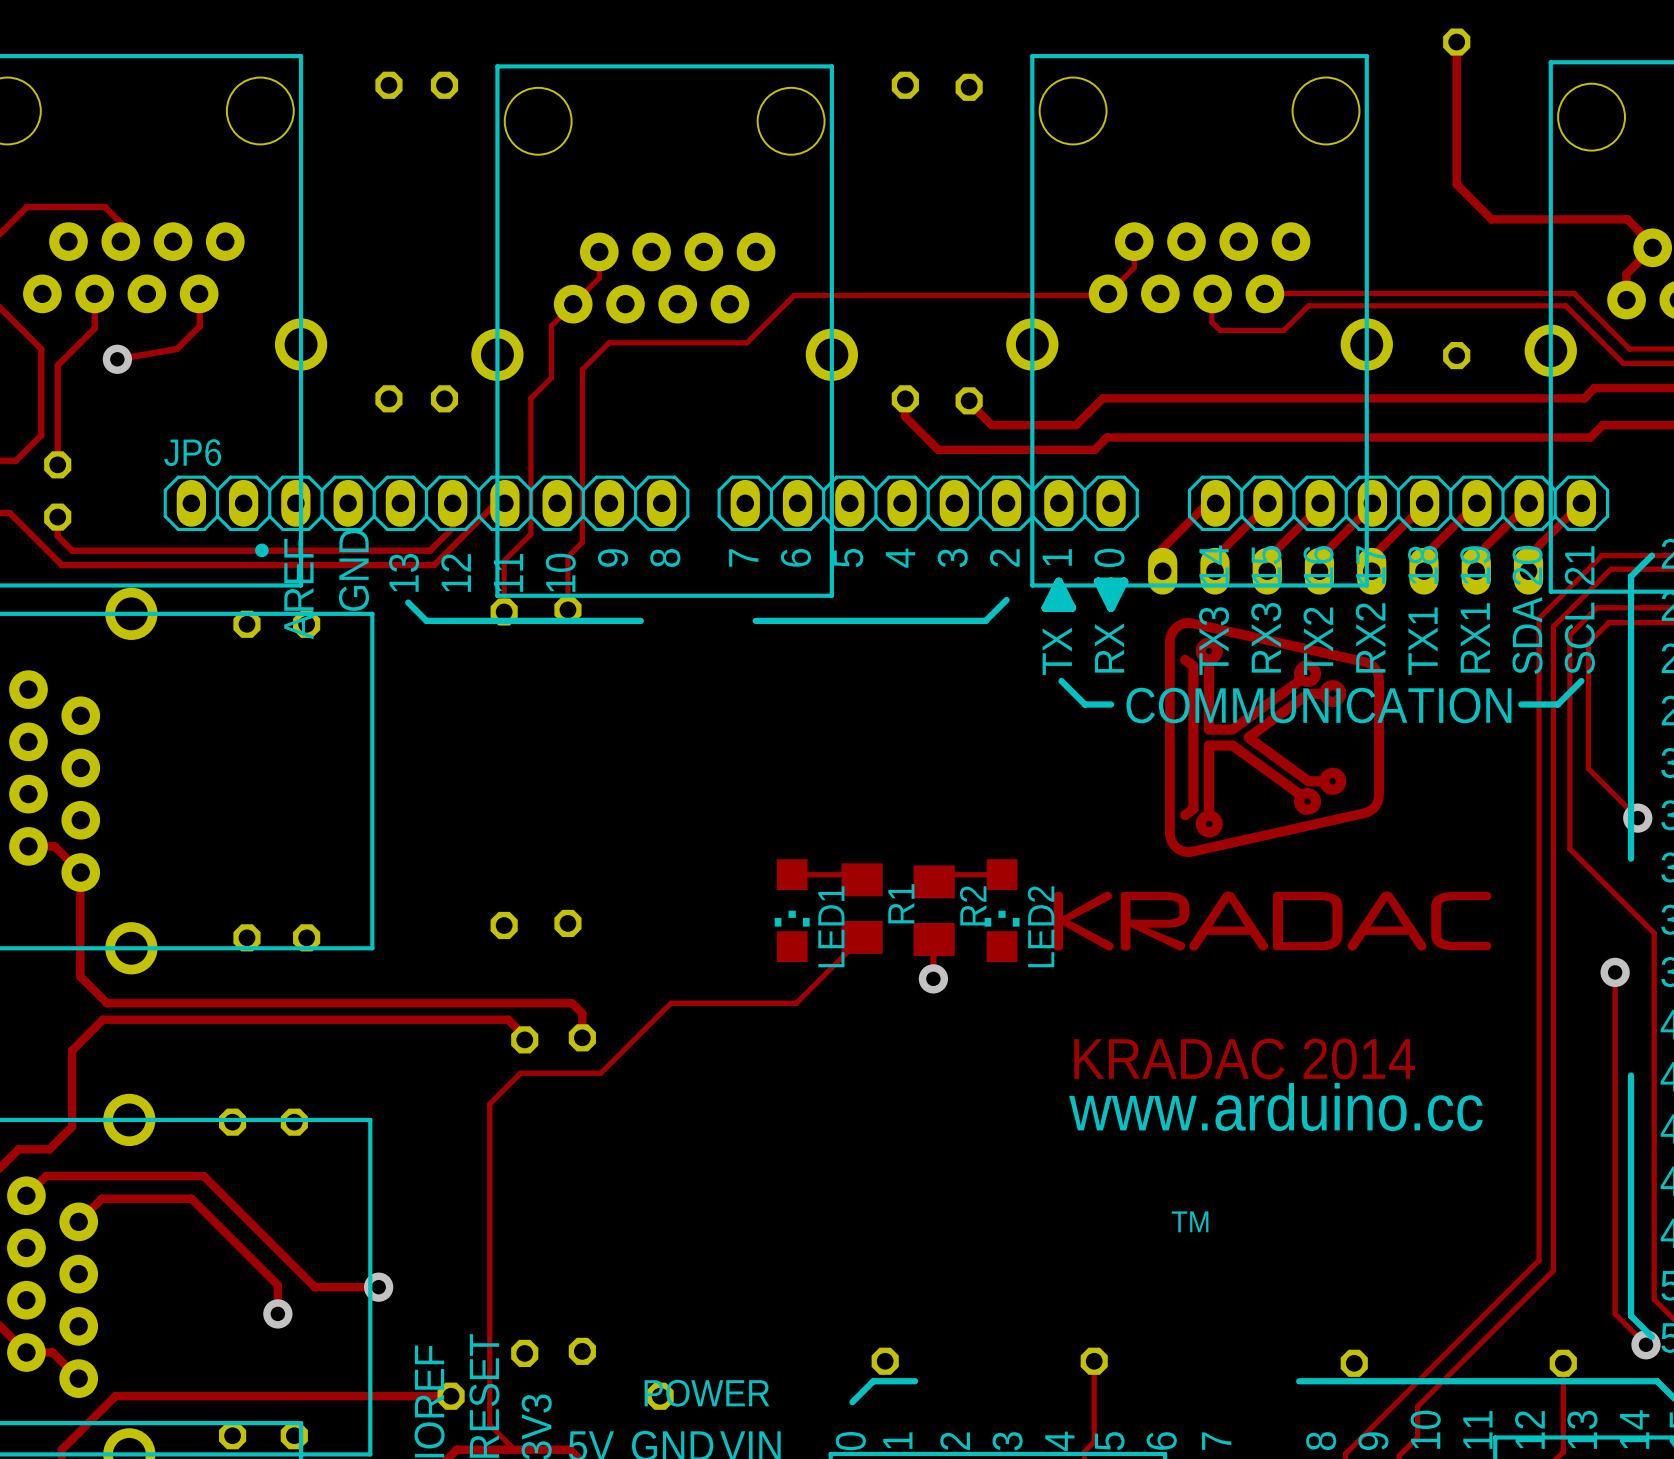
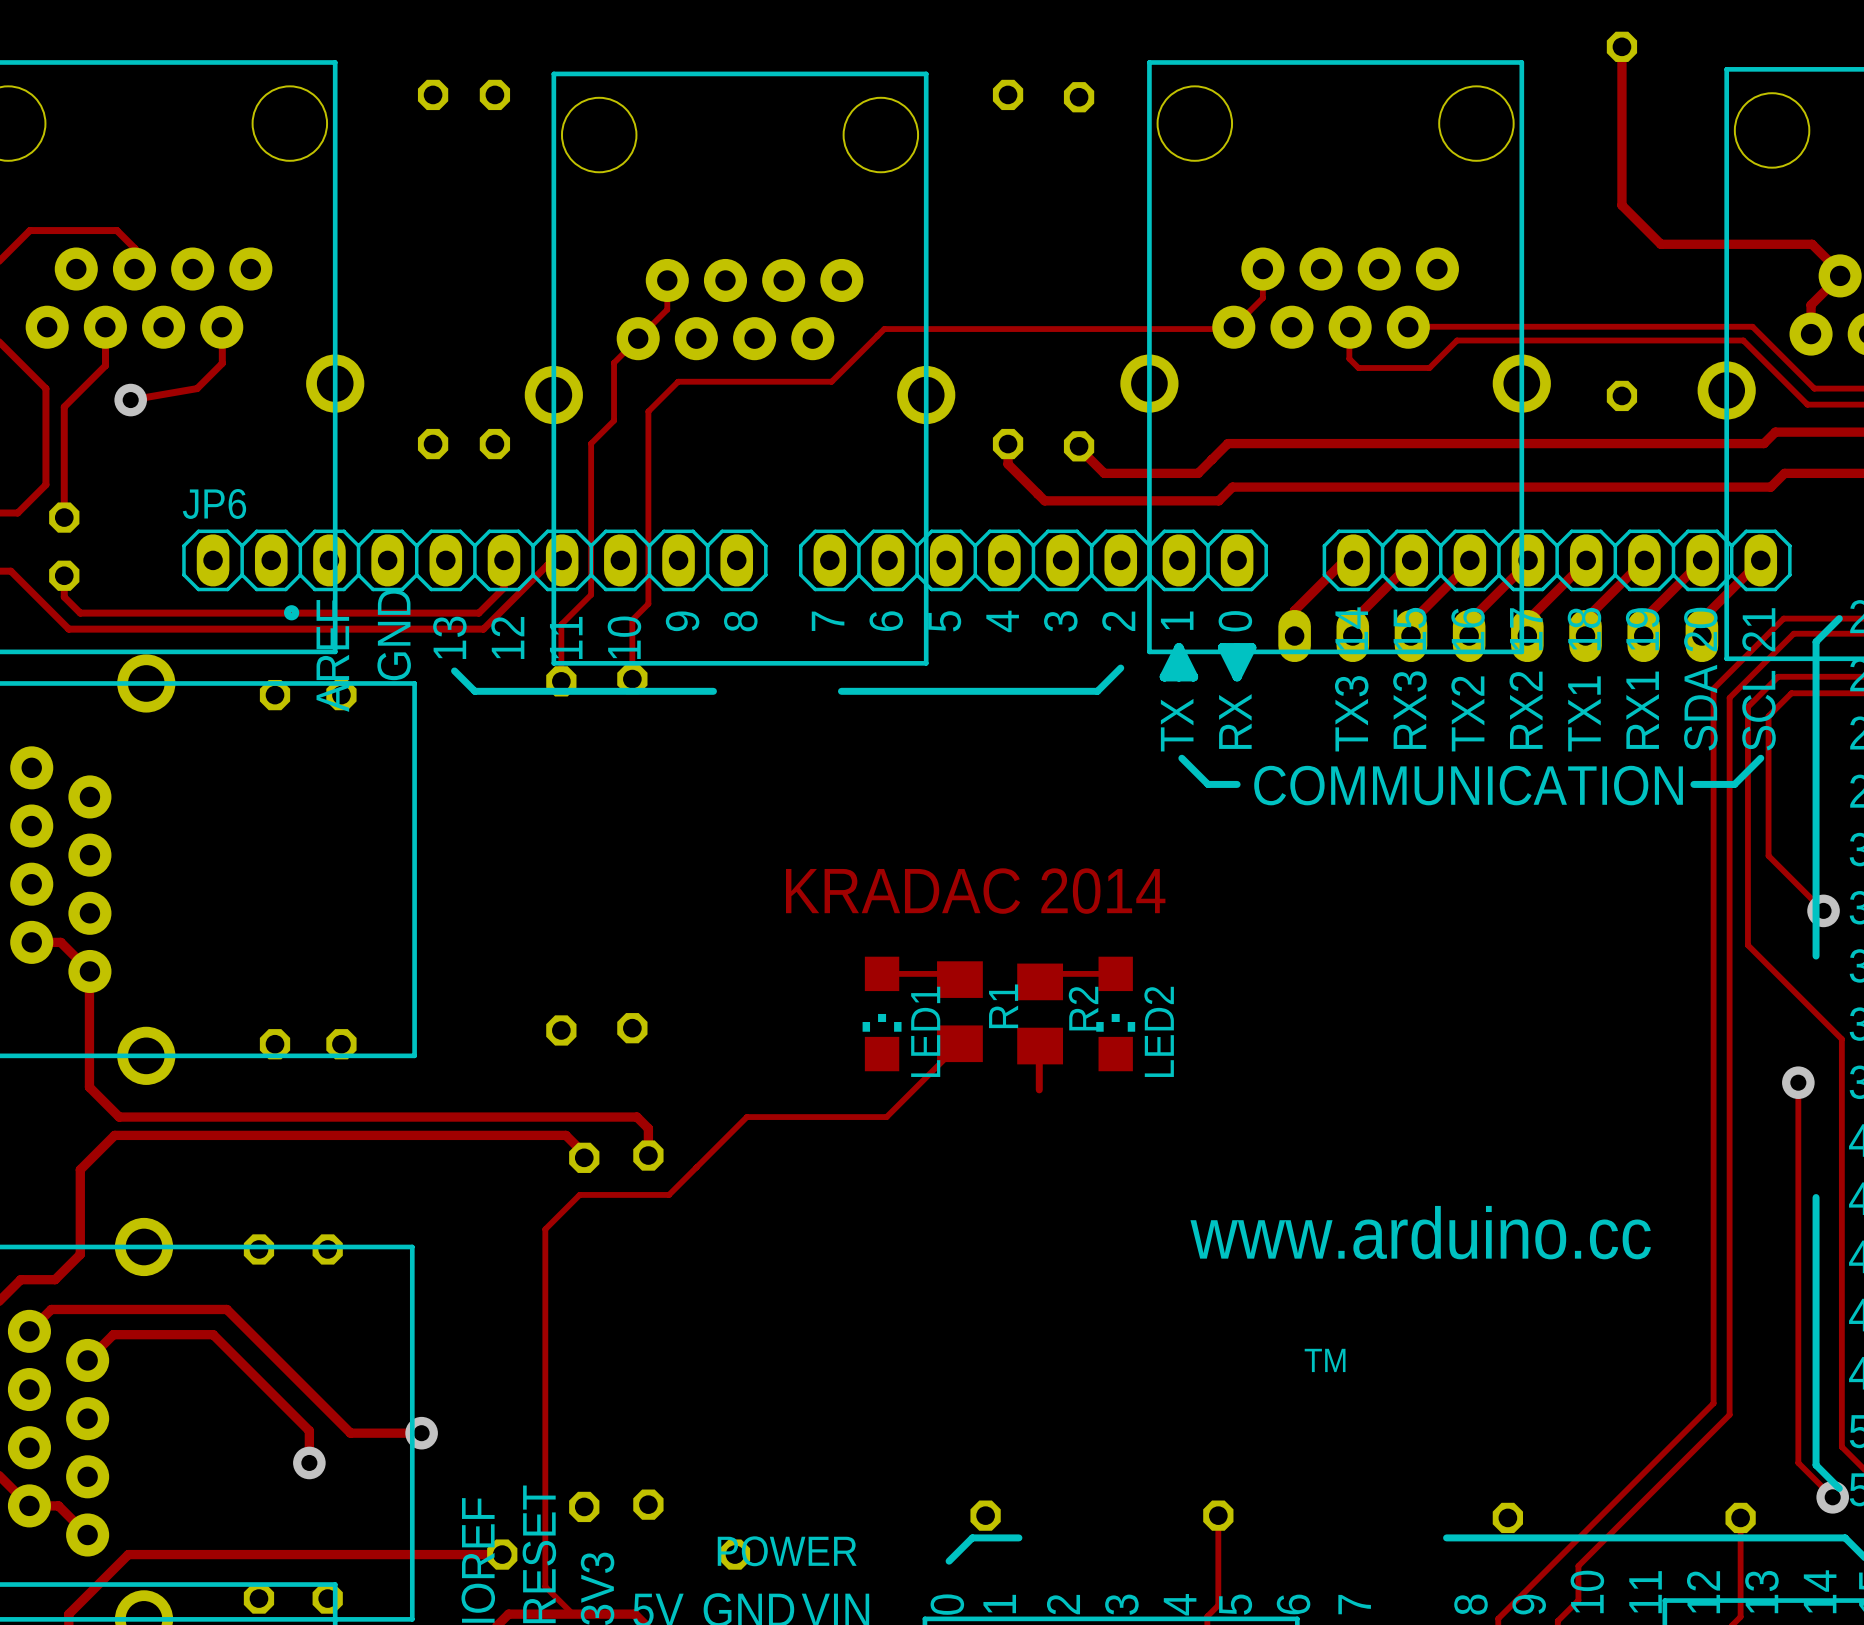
drawing: [1165, 618, 1385, 857] -> none
drawing: [1053, 891, 1492, 951] -> none
via: (933, 978) -> none
text position: KRADAC 2014 (1244, 1058) -> KRADAC 2014 (975, 891)

